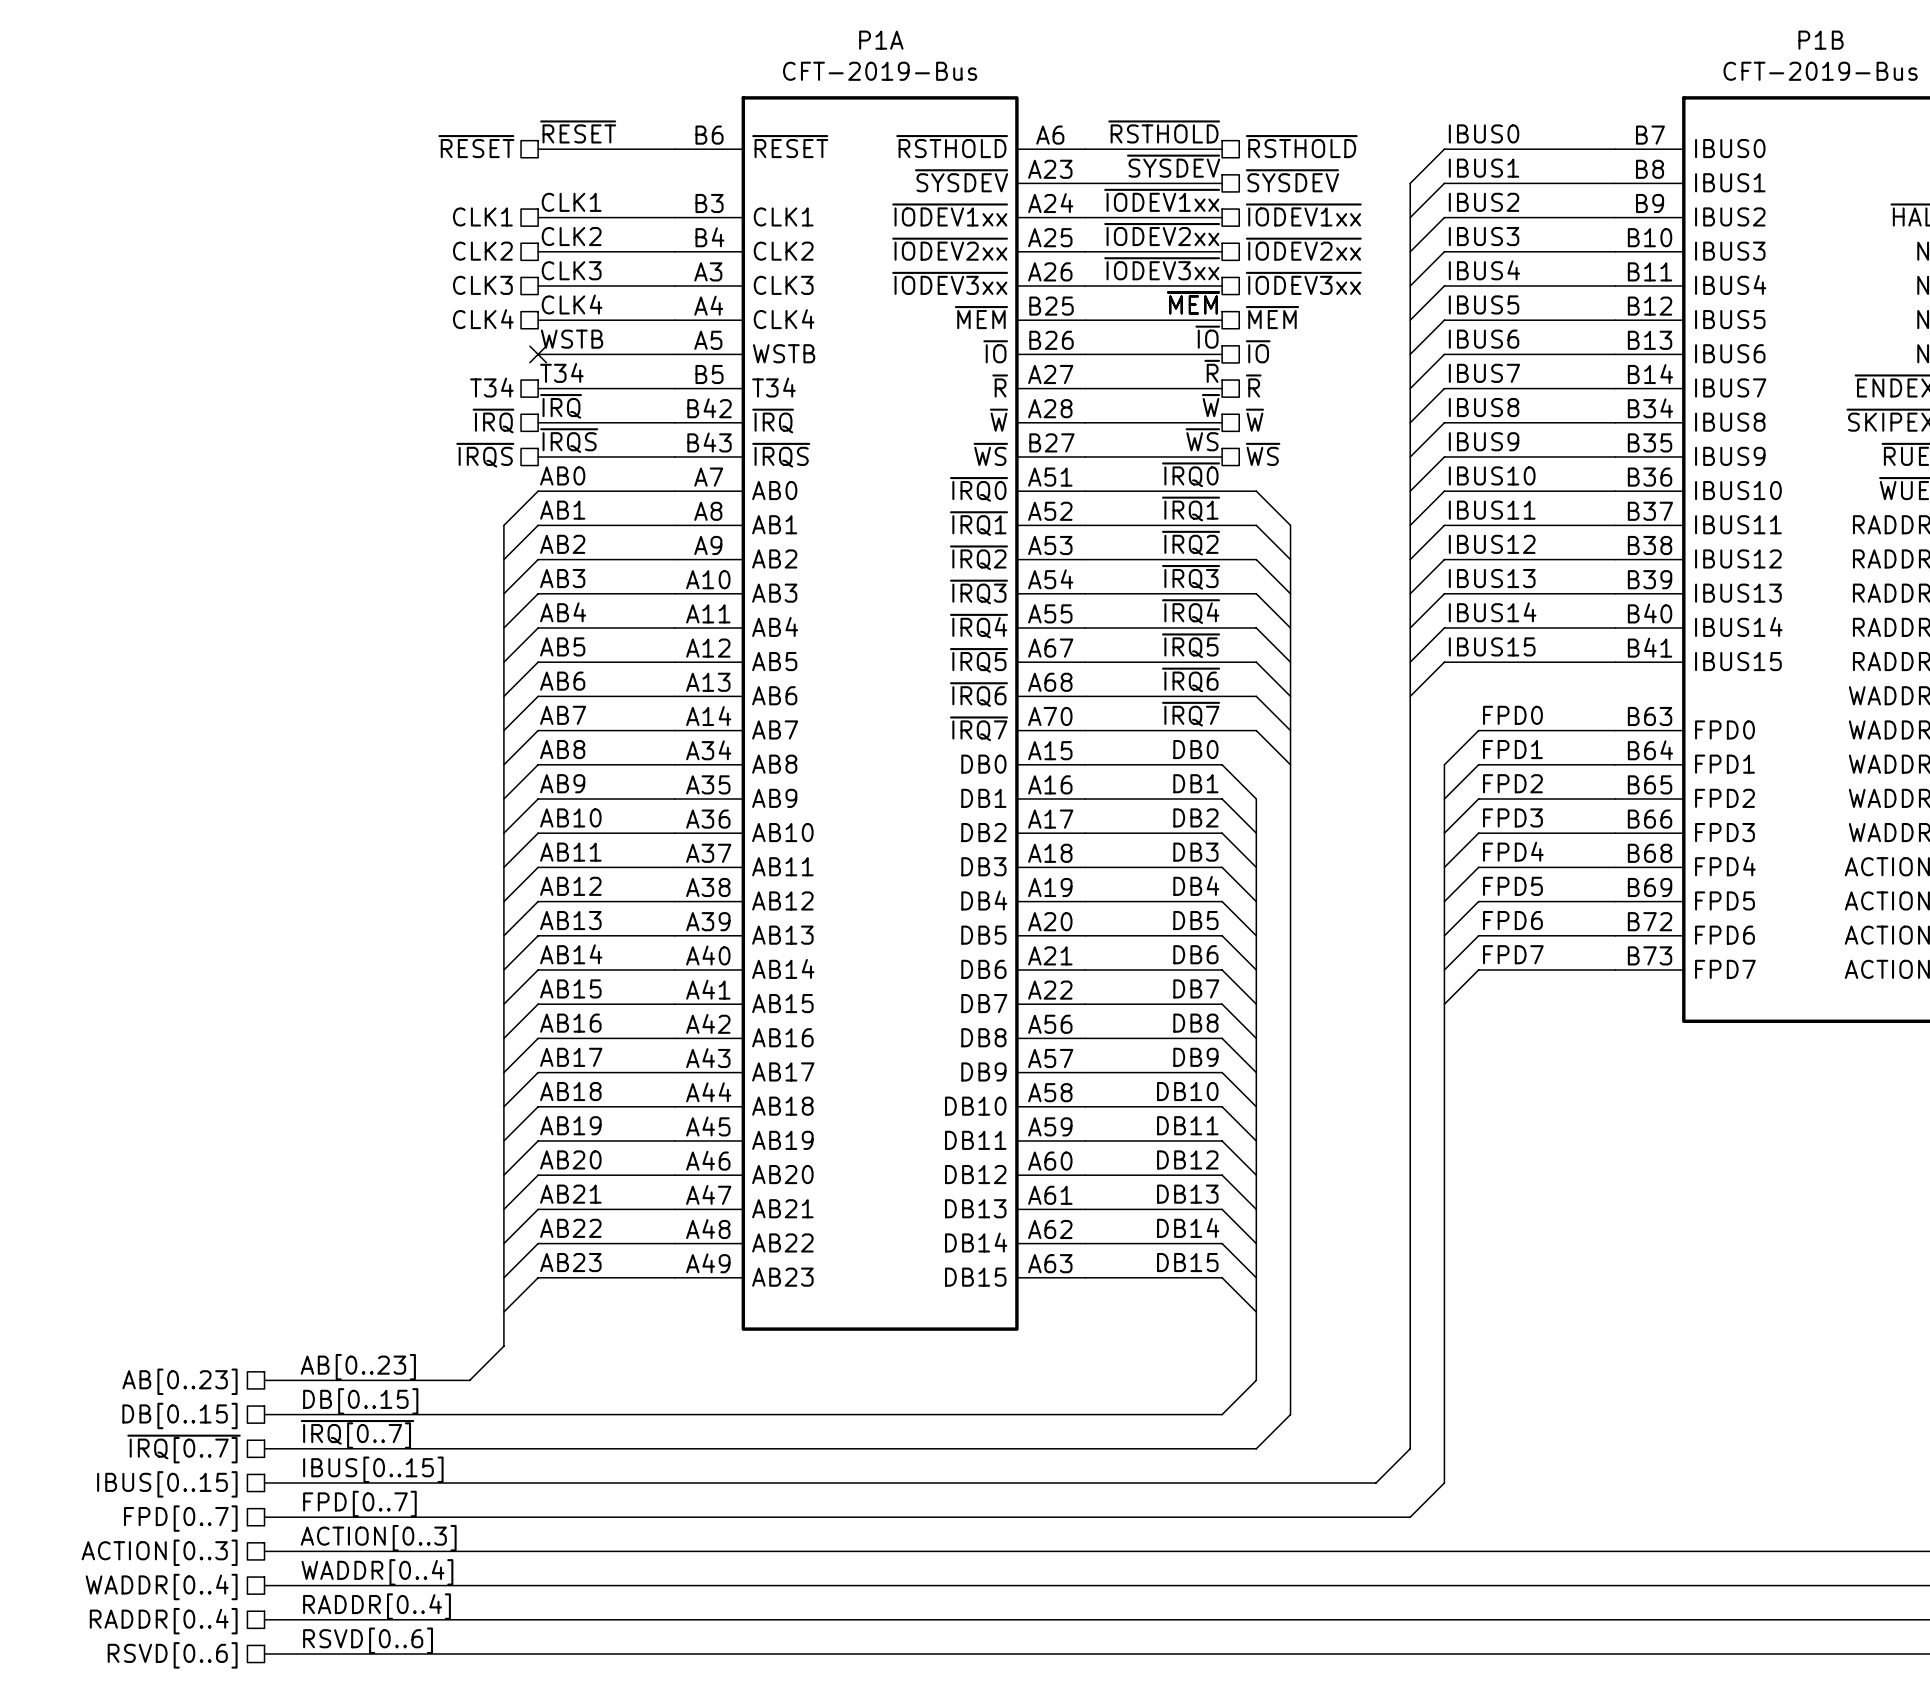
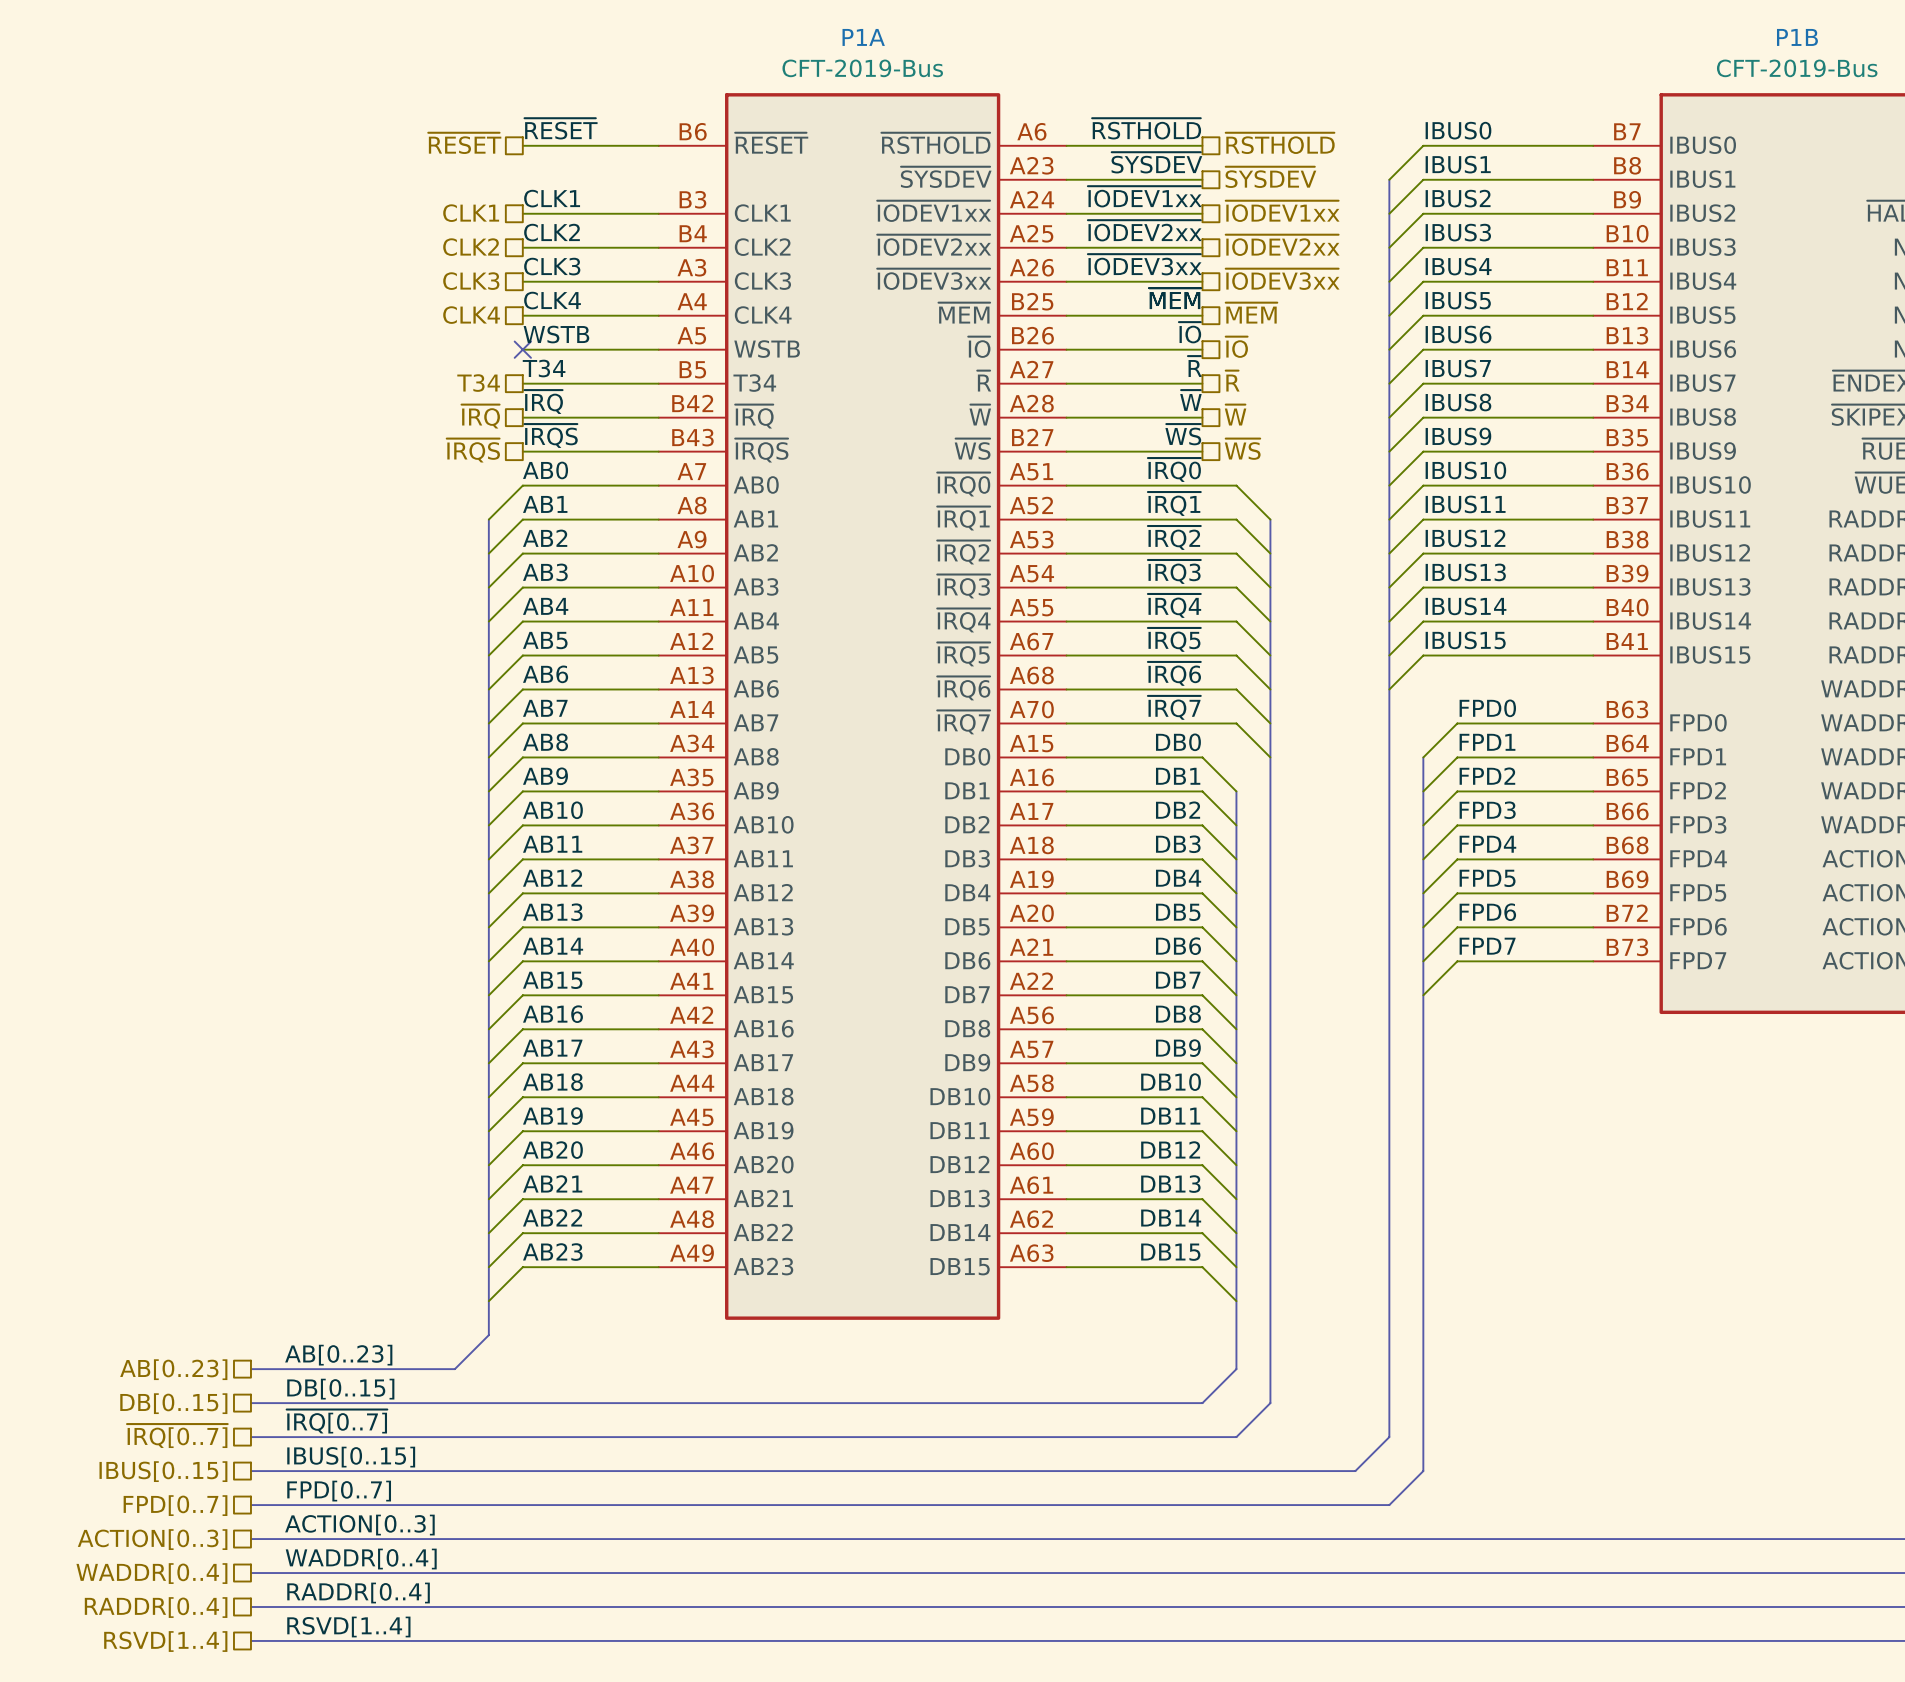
label: RSVD[0..6] (368, 1640) -> RSVD[1..4] (348, 1626)
hierarchical label: RSVD[0..6] (172, 1655) -> RSVD[1..4] (165, 1641)

